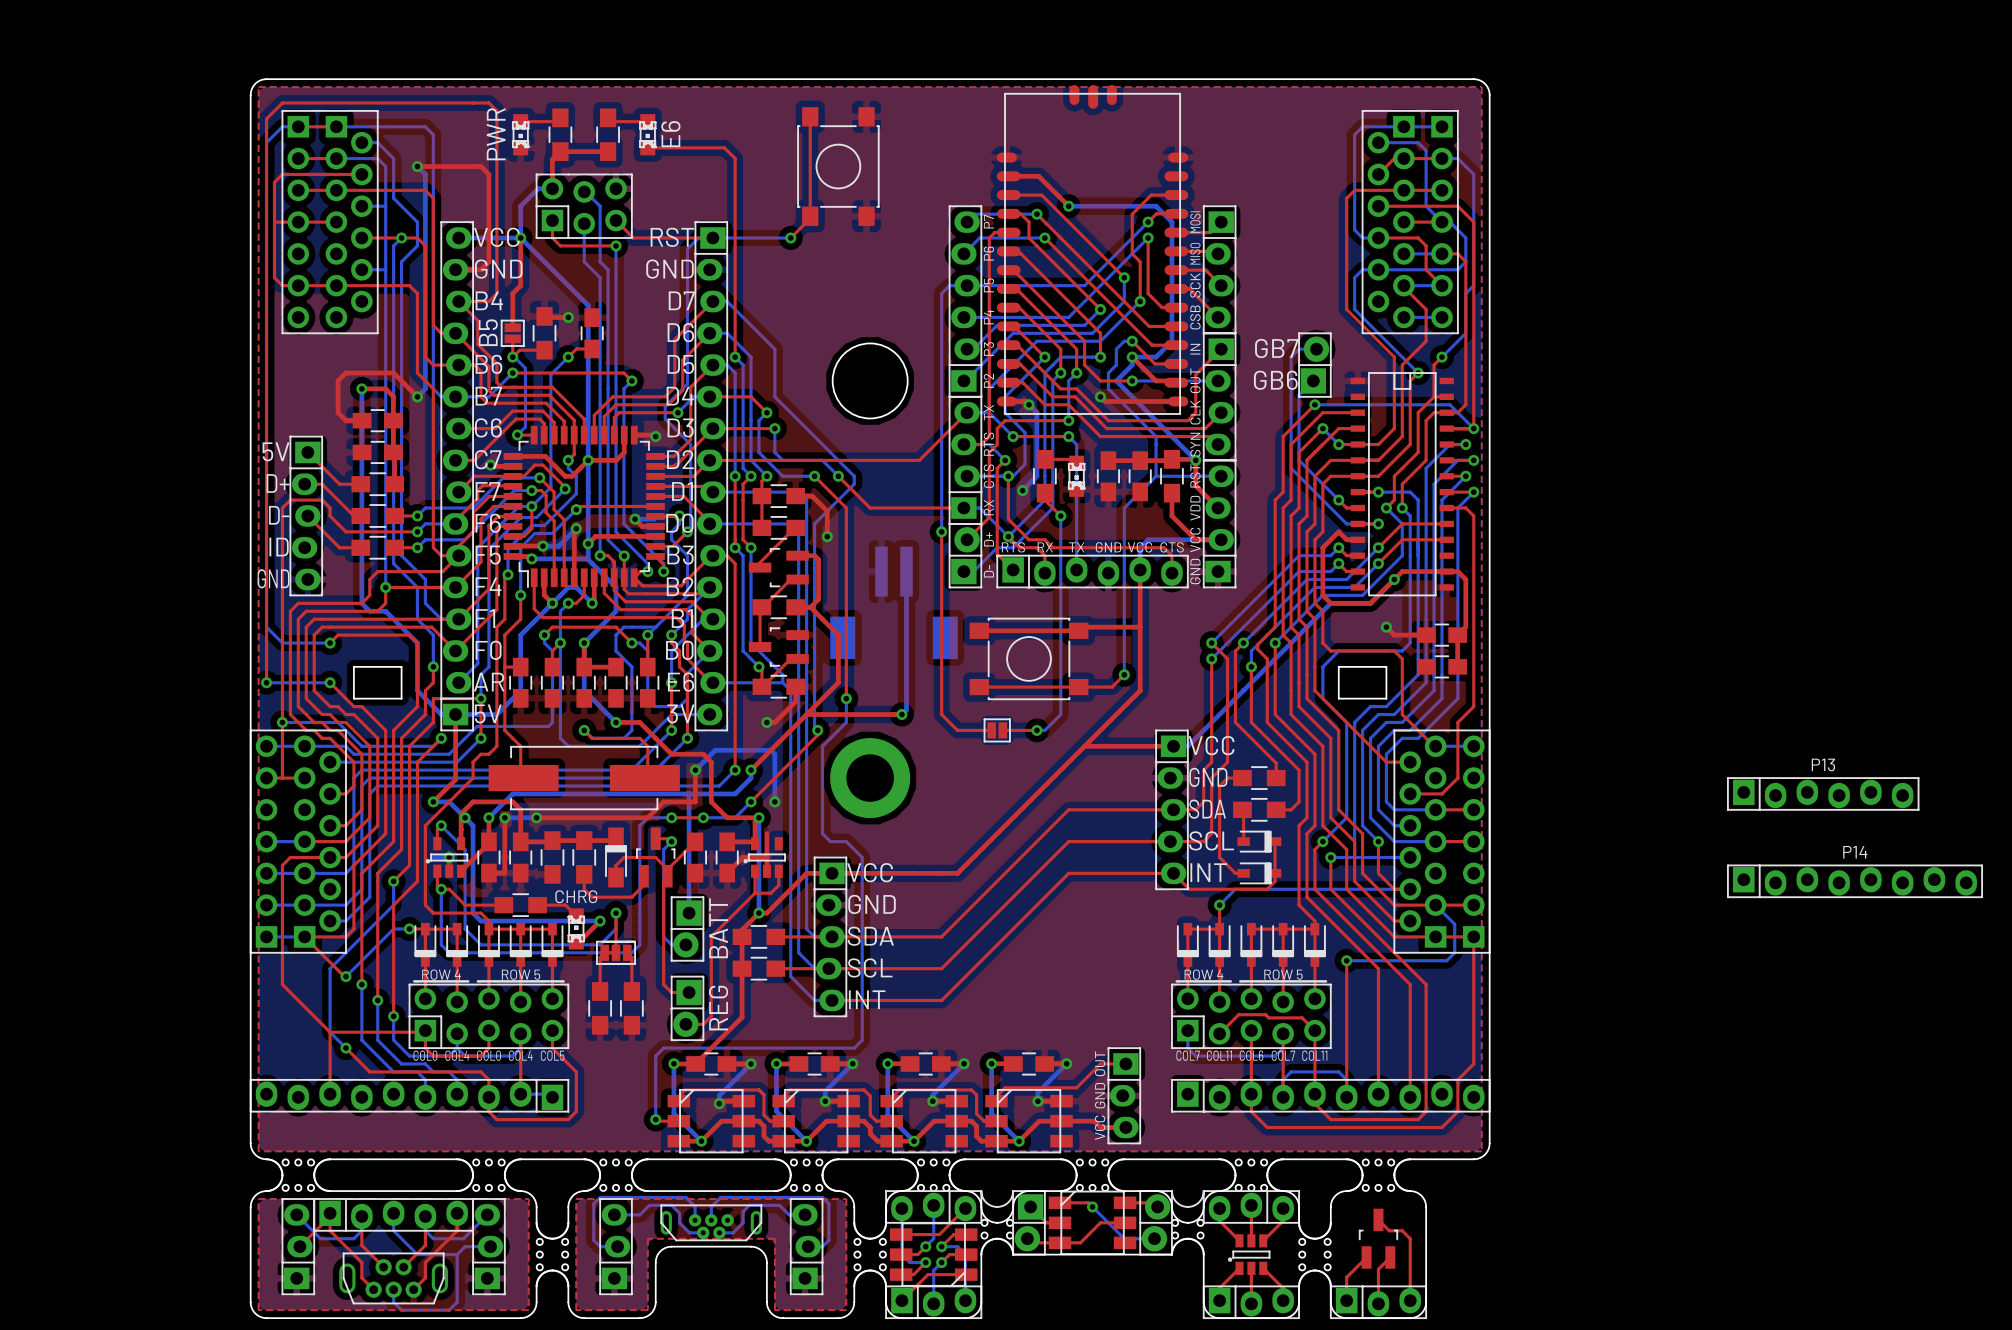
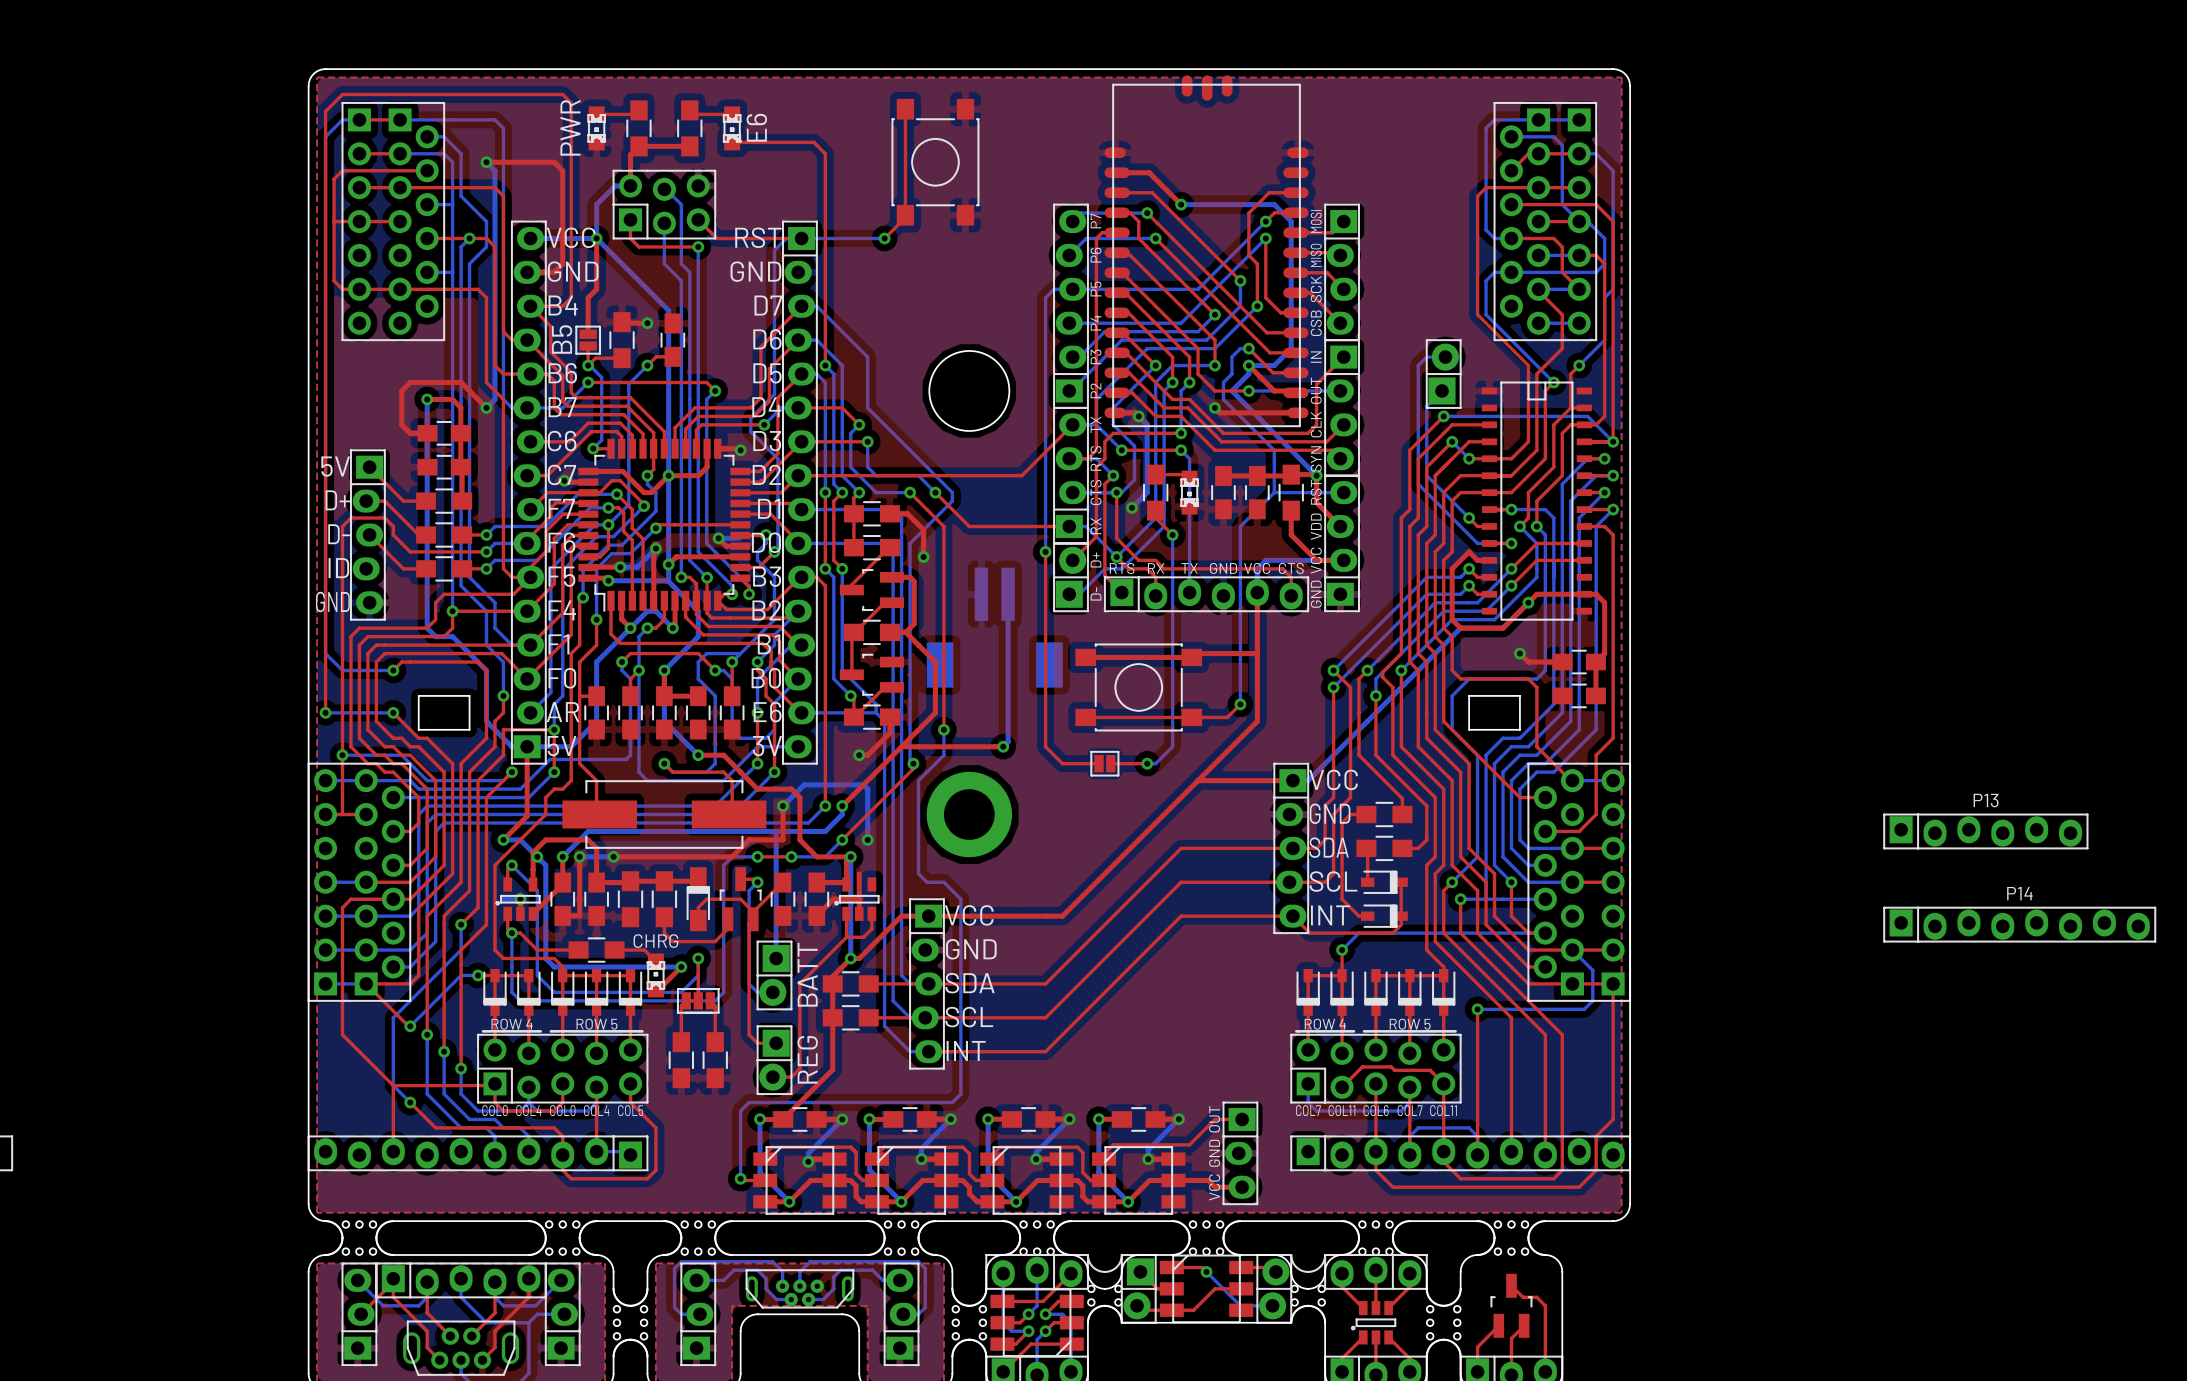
text: GB7 (1276, 348) -> none
text: GB6 (1275, 380) -> none

